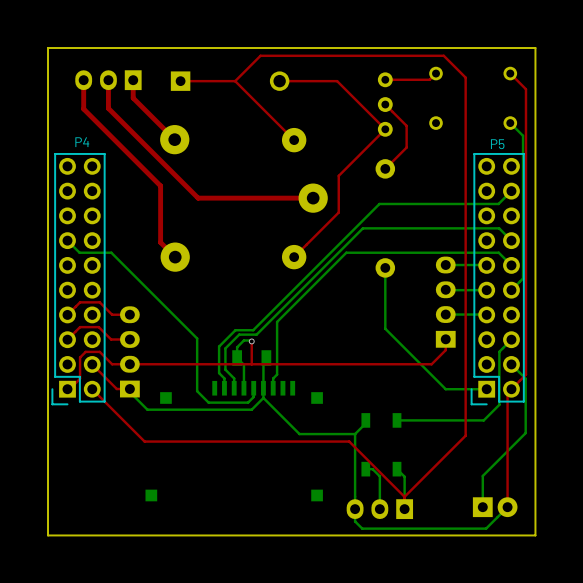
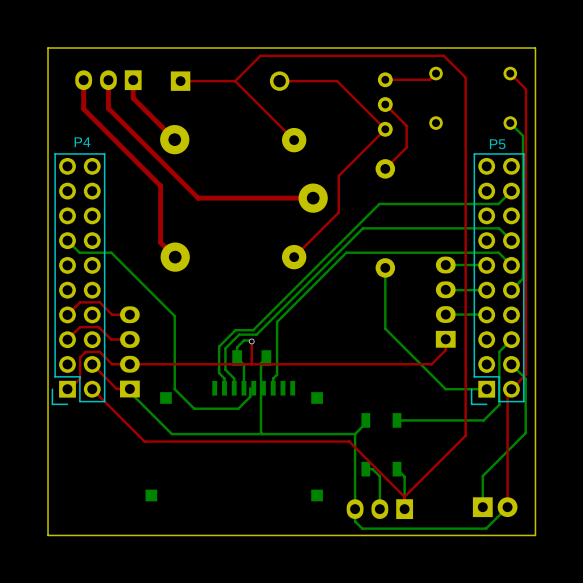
bottom track: (174, 316) (197, 338) (197, 391) (208, 402) (248, 402) (253, 397) (253, 388) -> (174, 316) (174, 389) (194, 408) (238, 408) (250, 396) (250, 388)
bottom track: (263, 360) (263, 397) -> (263, 360) (261, 363) (262, 434)
bottom track: (263, 397) (251, 409) (147, 409) -> (299, 434) (171, 434) (147, 409)
bottom track: (263, 397) (299, 434) -> none

